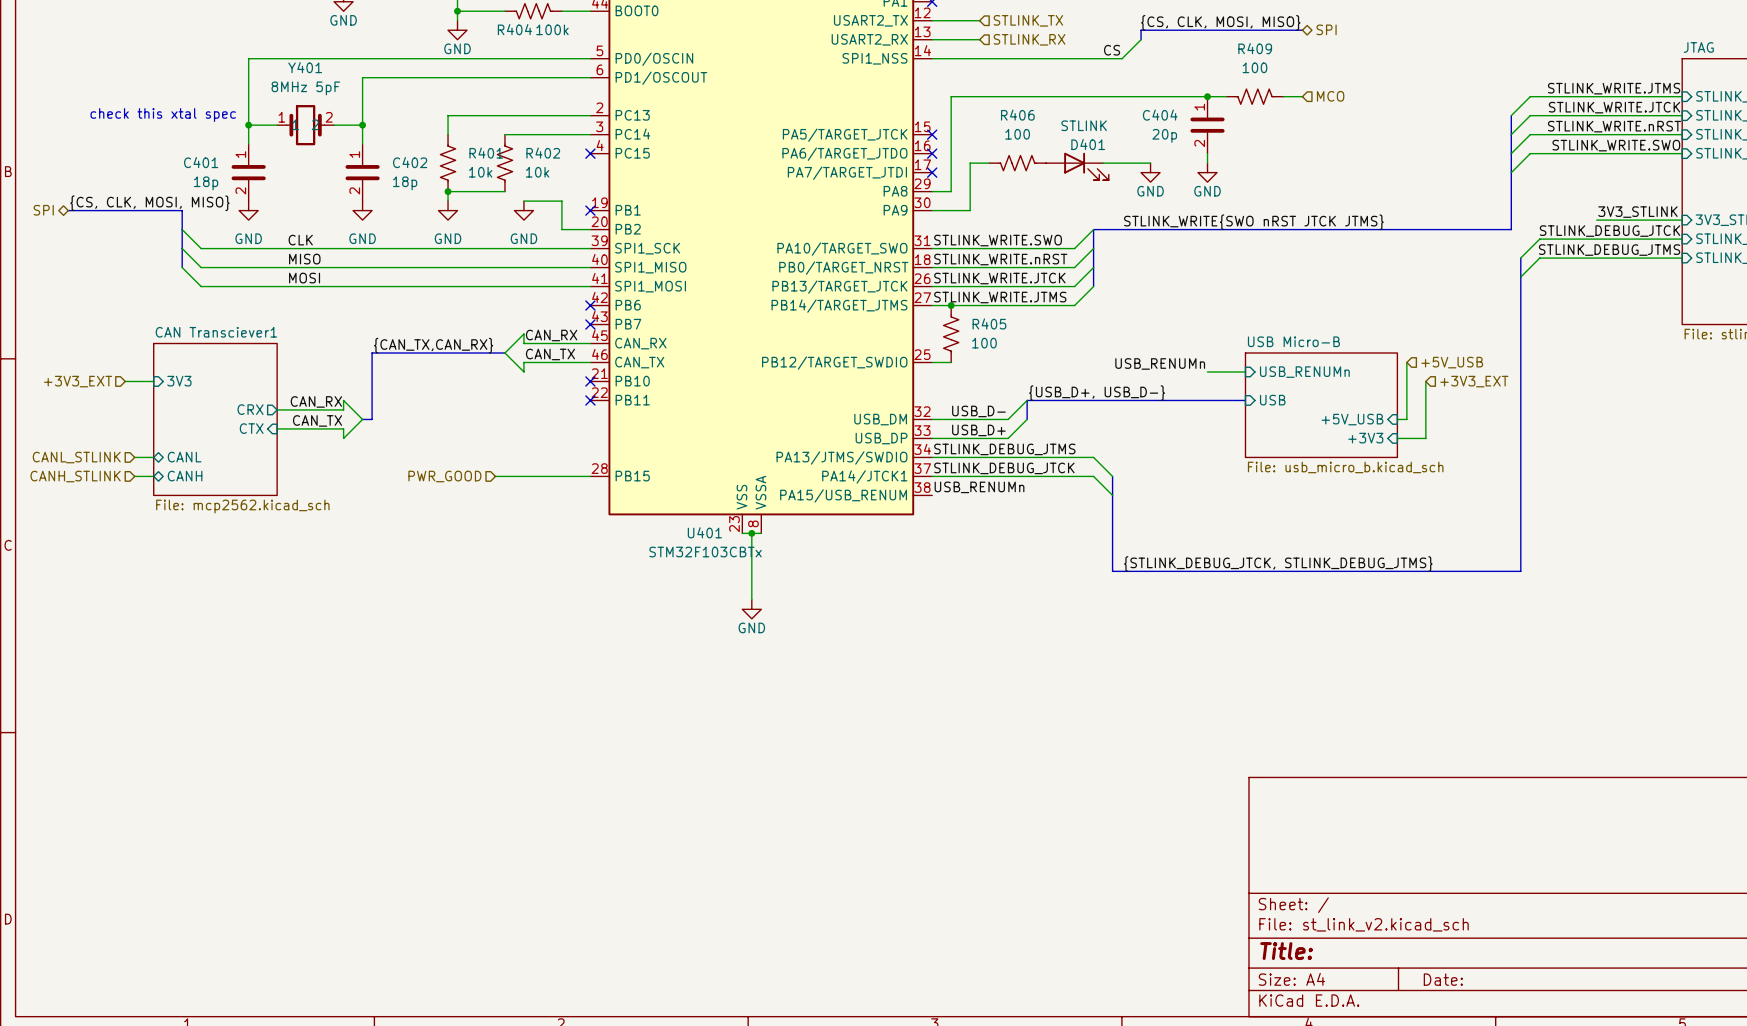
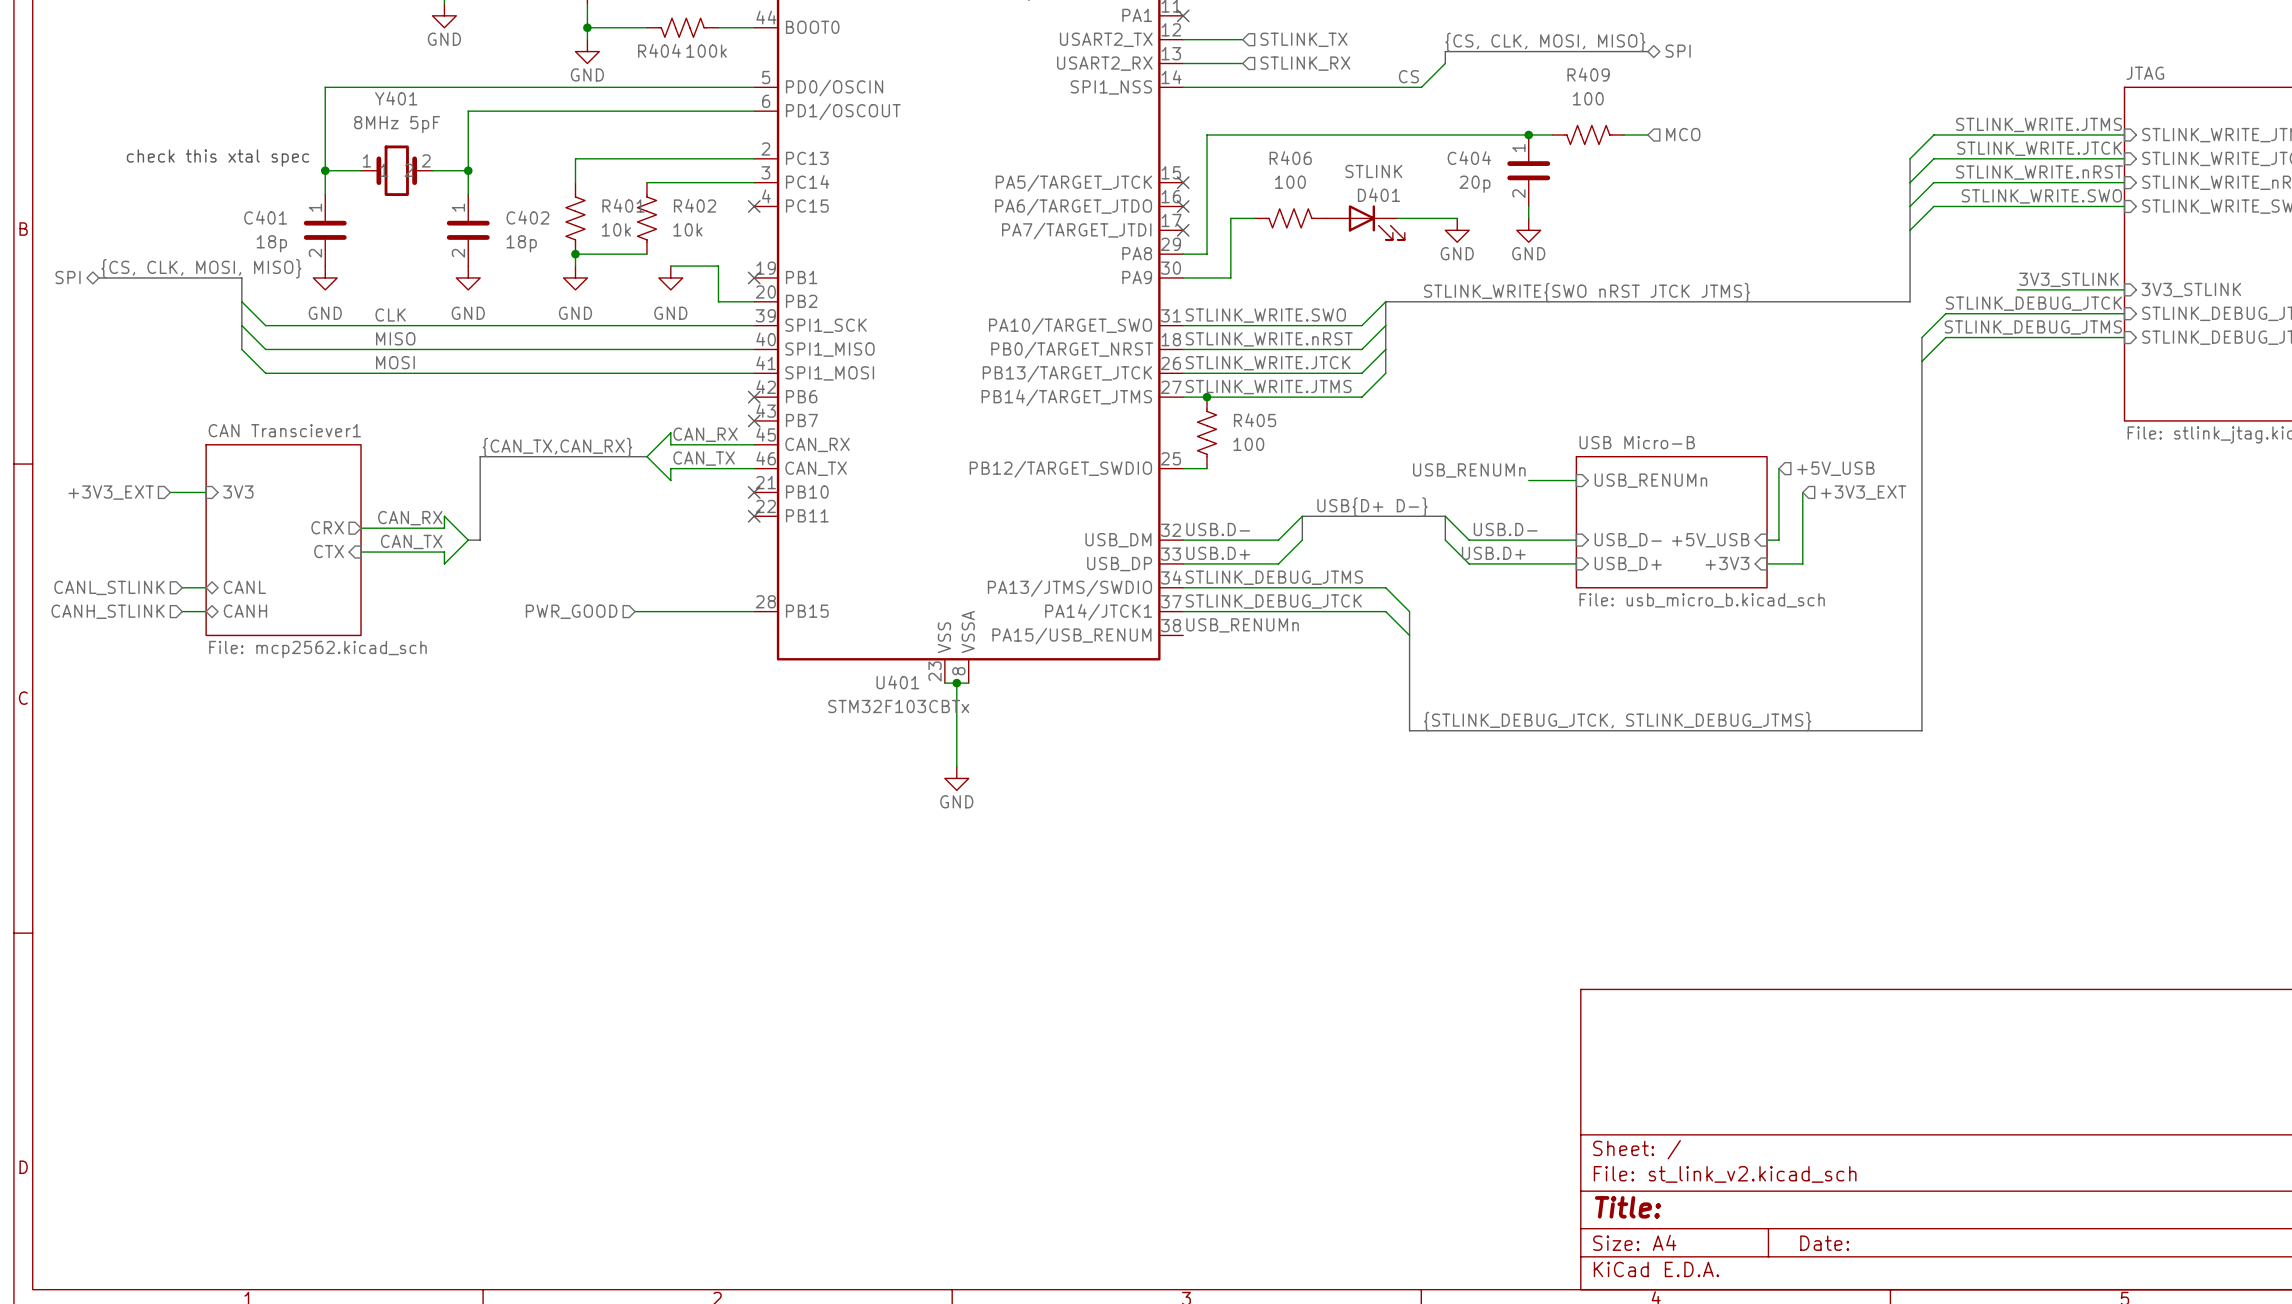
label: {USB_D+, USB_D-} (1097, 393) -> USB{D+ D-} (1372, 507)
wire: none -> (1445, 516) (1469, 540) (1576, 540)
bus: (1141, 400) (1245, 400) -> (1445, 516) (1445, 540)
sheet pin: USB (1272, 400) -> USB_D- (1628, 540)
label: none -> USB.D- (1218, 529)
label: none -> USB.D- (1505, 529)
label: USB_D- (978, 411) -> none
wire: none -> (1445, 540) (1469, 563) (1576, 563)
label: none -> USB.D+ (1218, 553)
label: none -> USB.D+ (1493, 553)
label: USB_D+ (978, 430) -> none
sheet pin: none -> USB_D+ (1628, 564)

